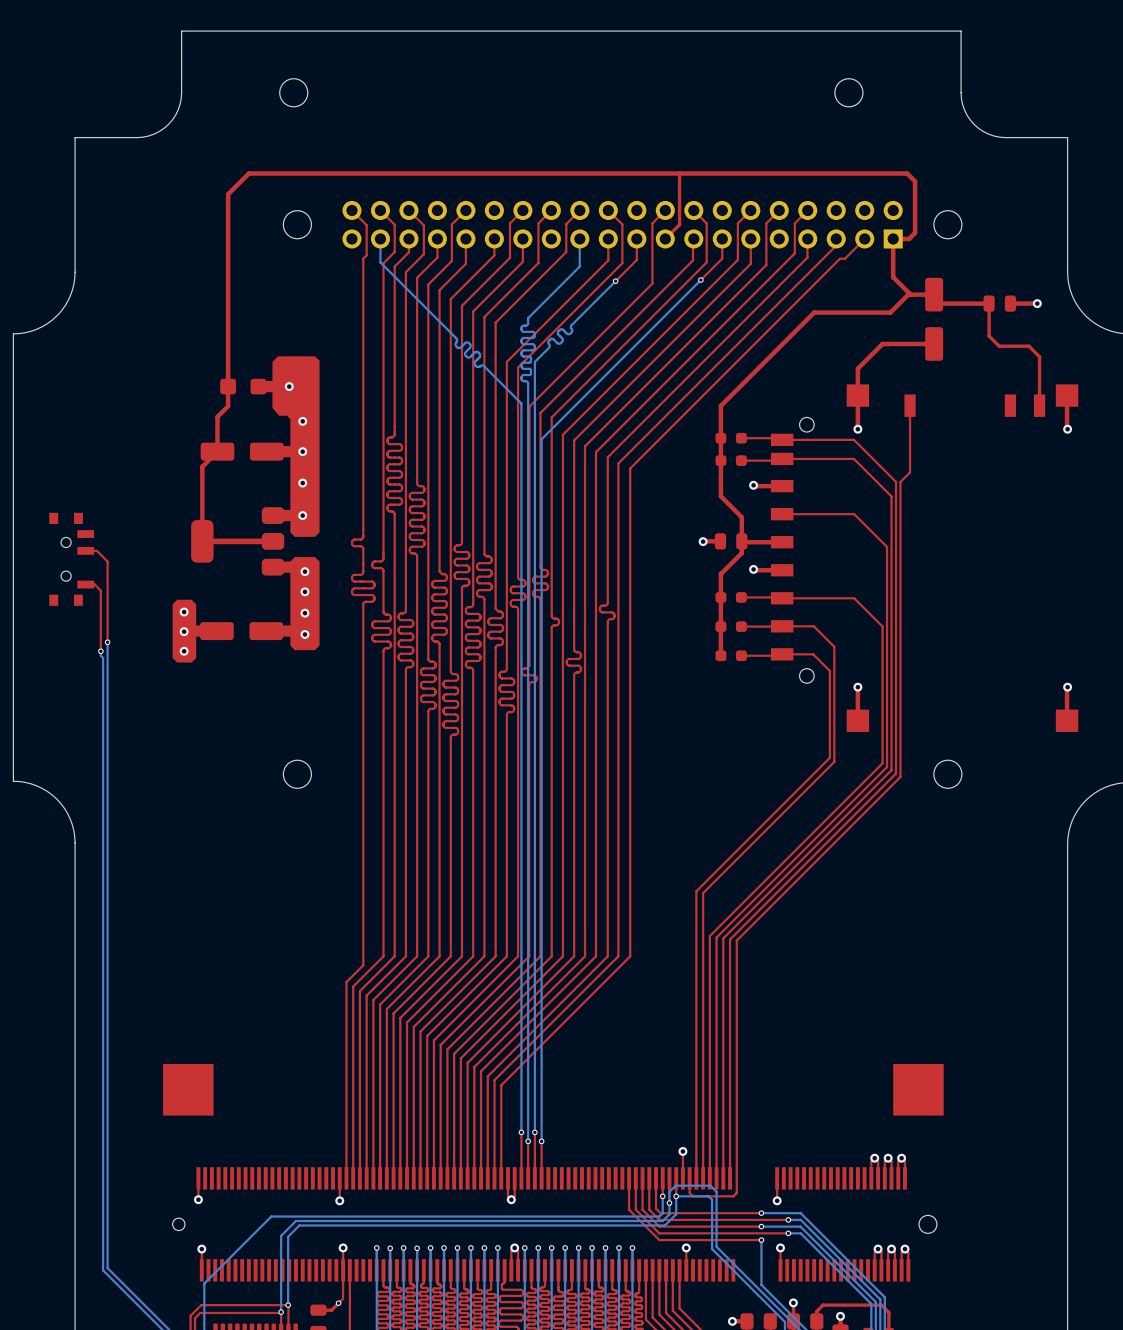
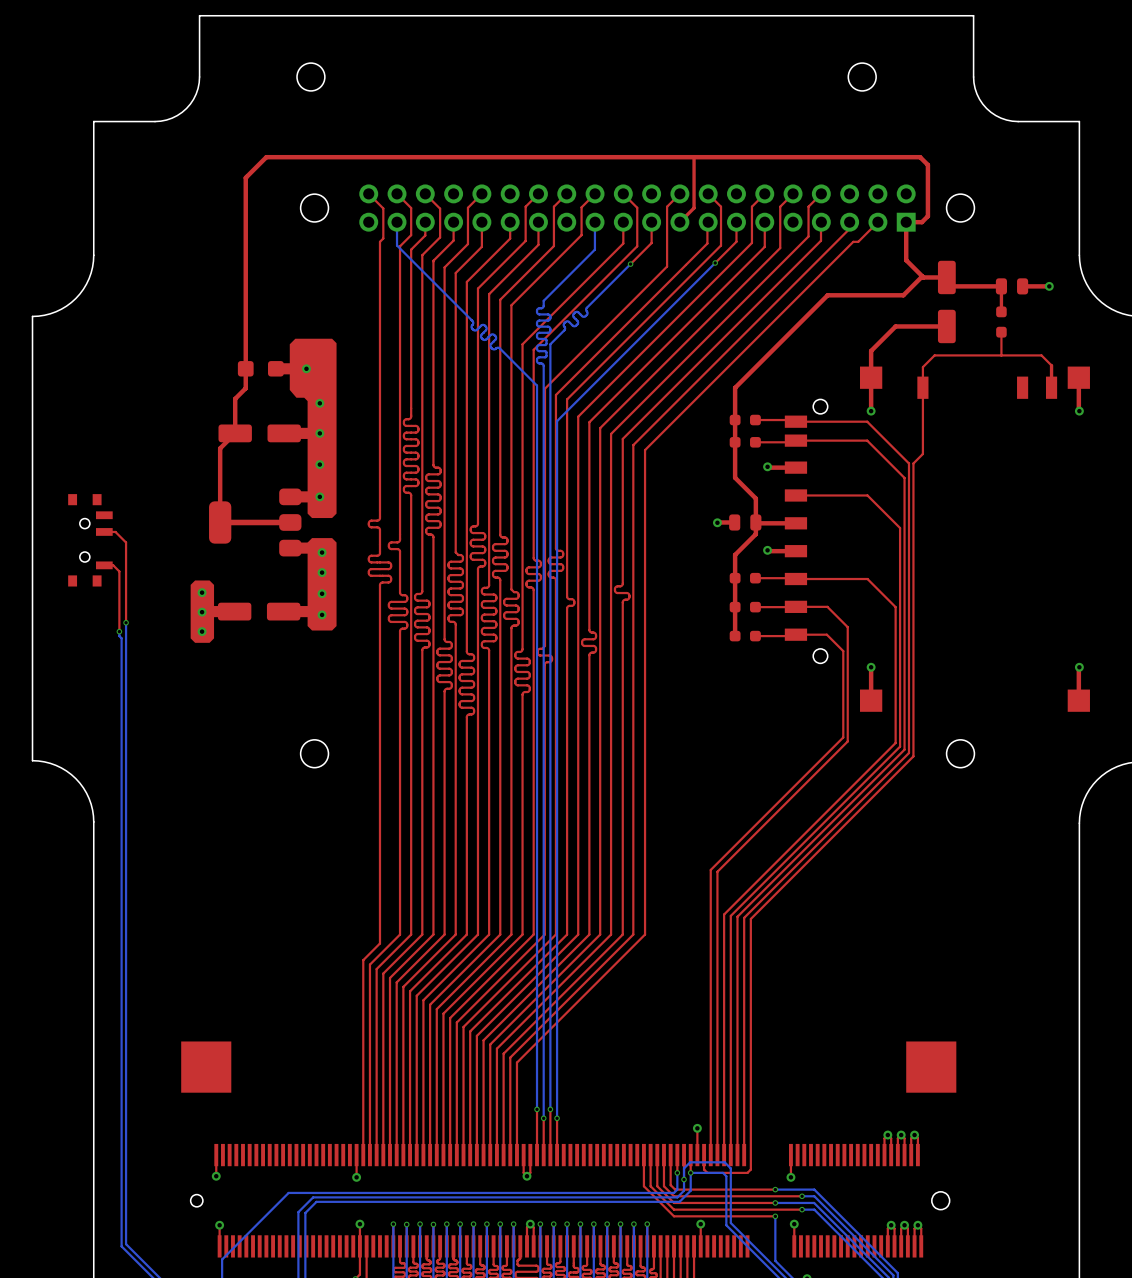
top track: (989, 329) (989, 336) (999, 346) (1028, 346) (1039, 356) (1039, 383) -> (922, 387) (922, 367) (934, 355) (1041, 355) (1051, 365)
part: none -> (1001, 322)
top track: none -> (1001, 332) (1001, 355)

